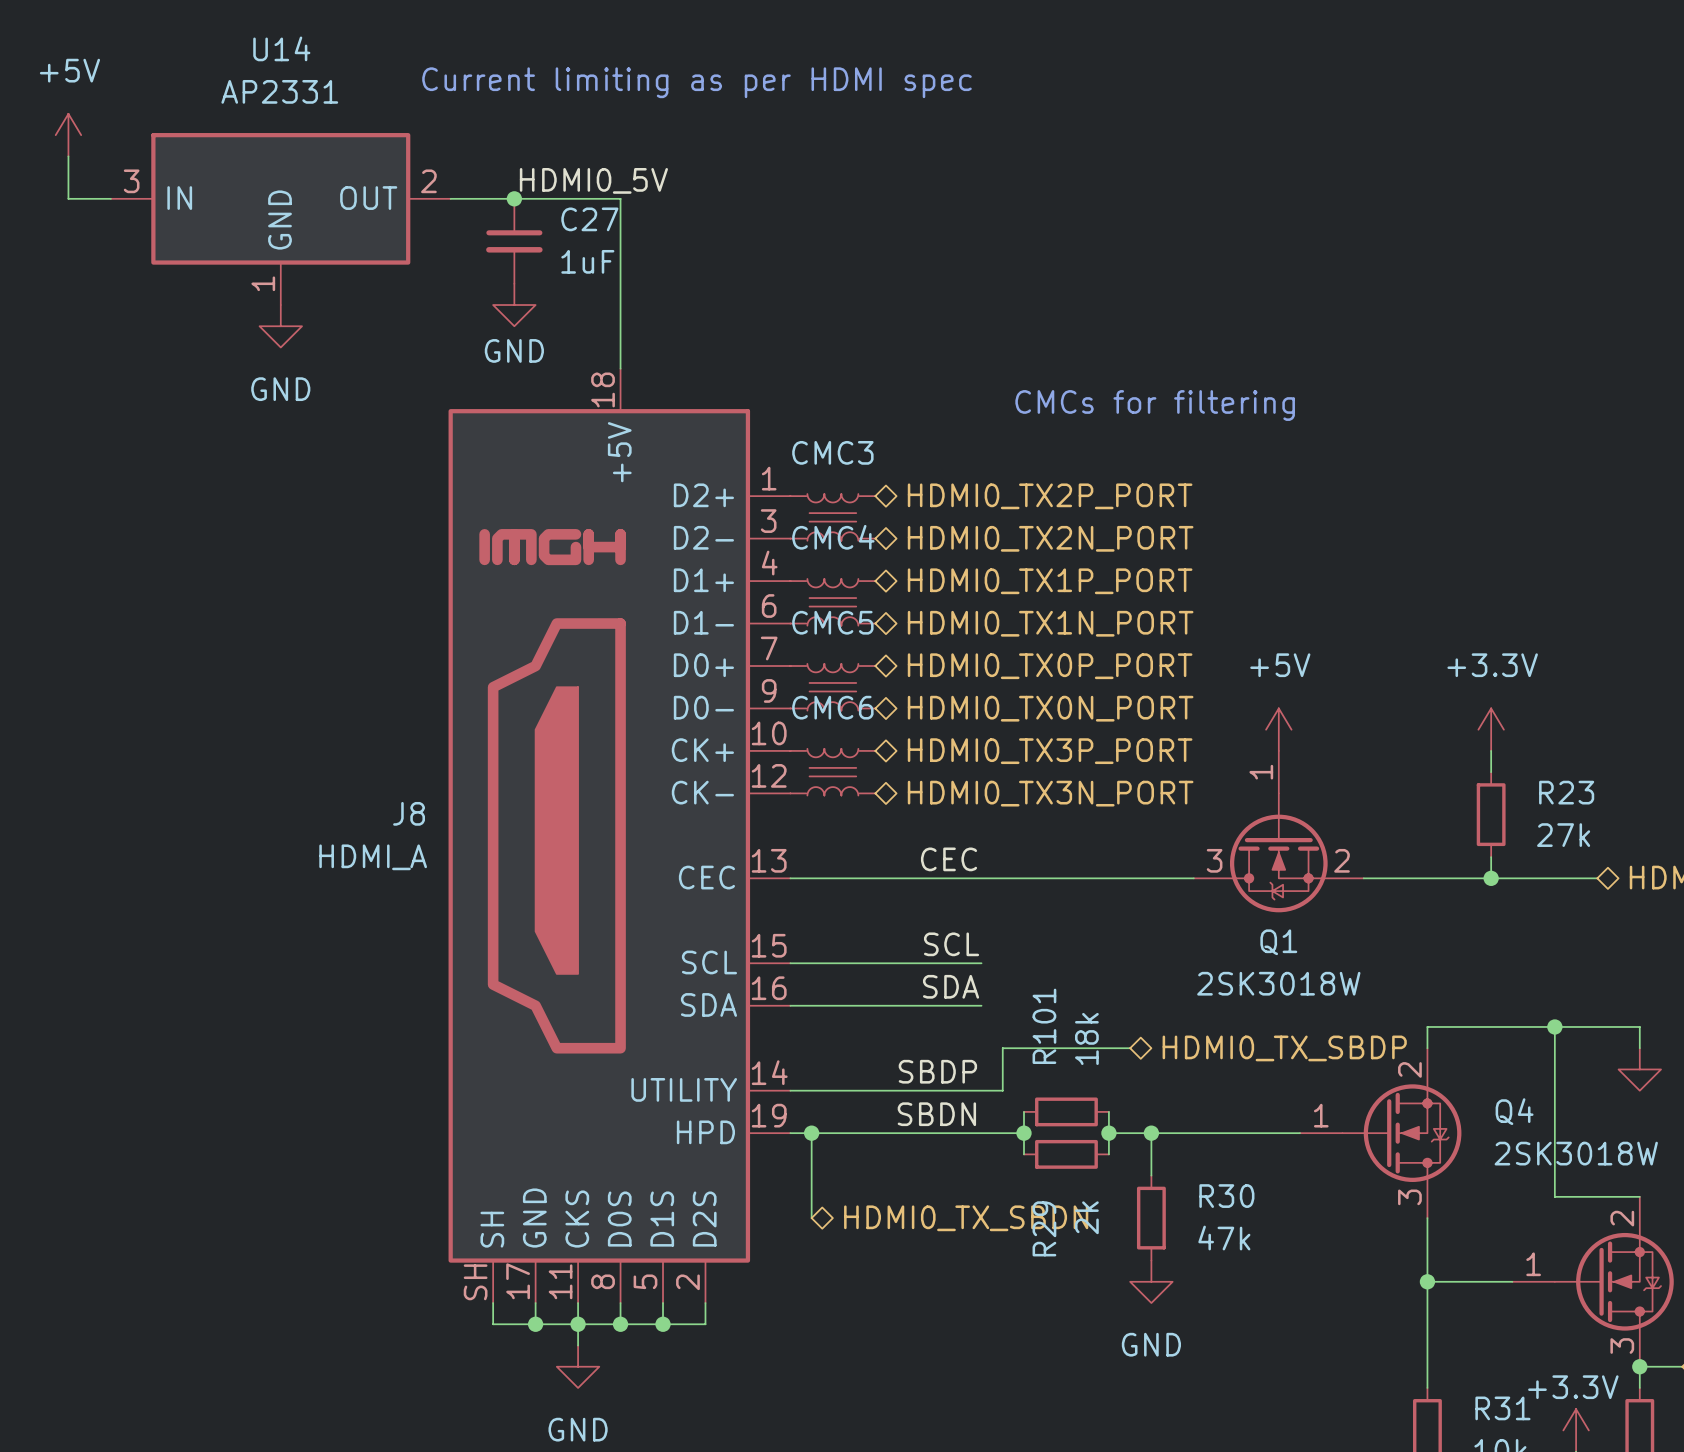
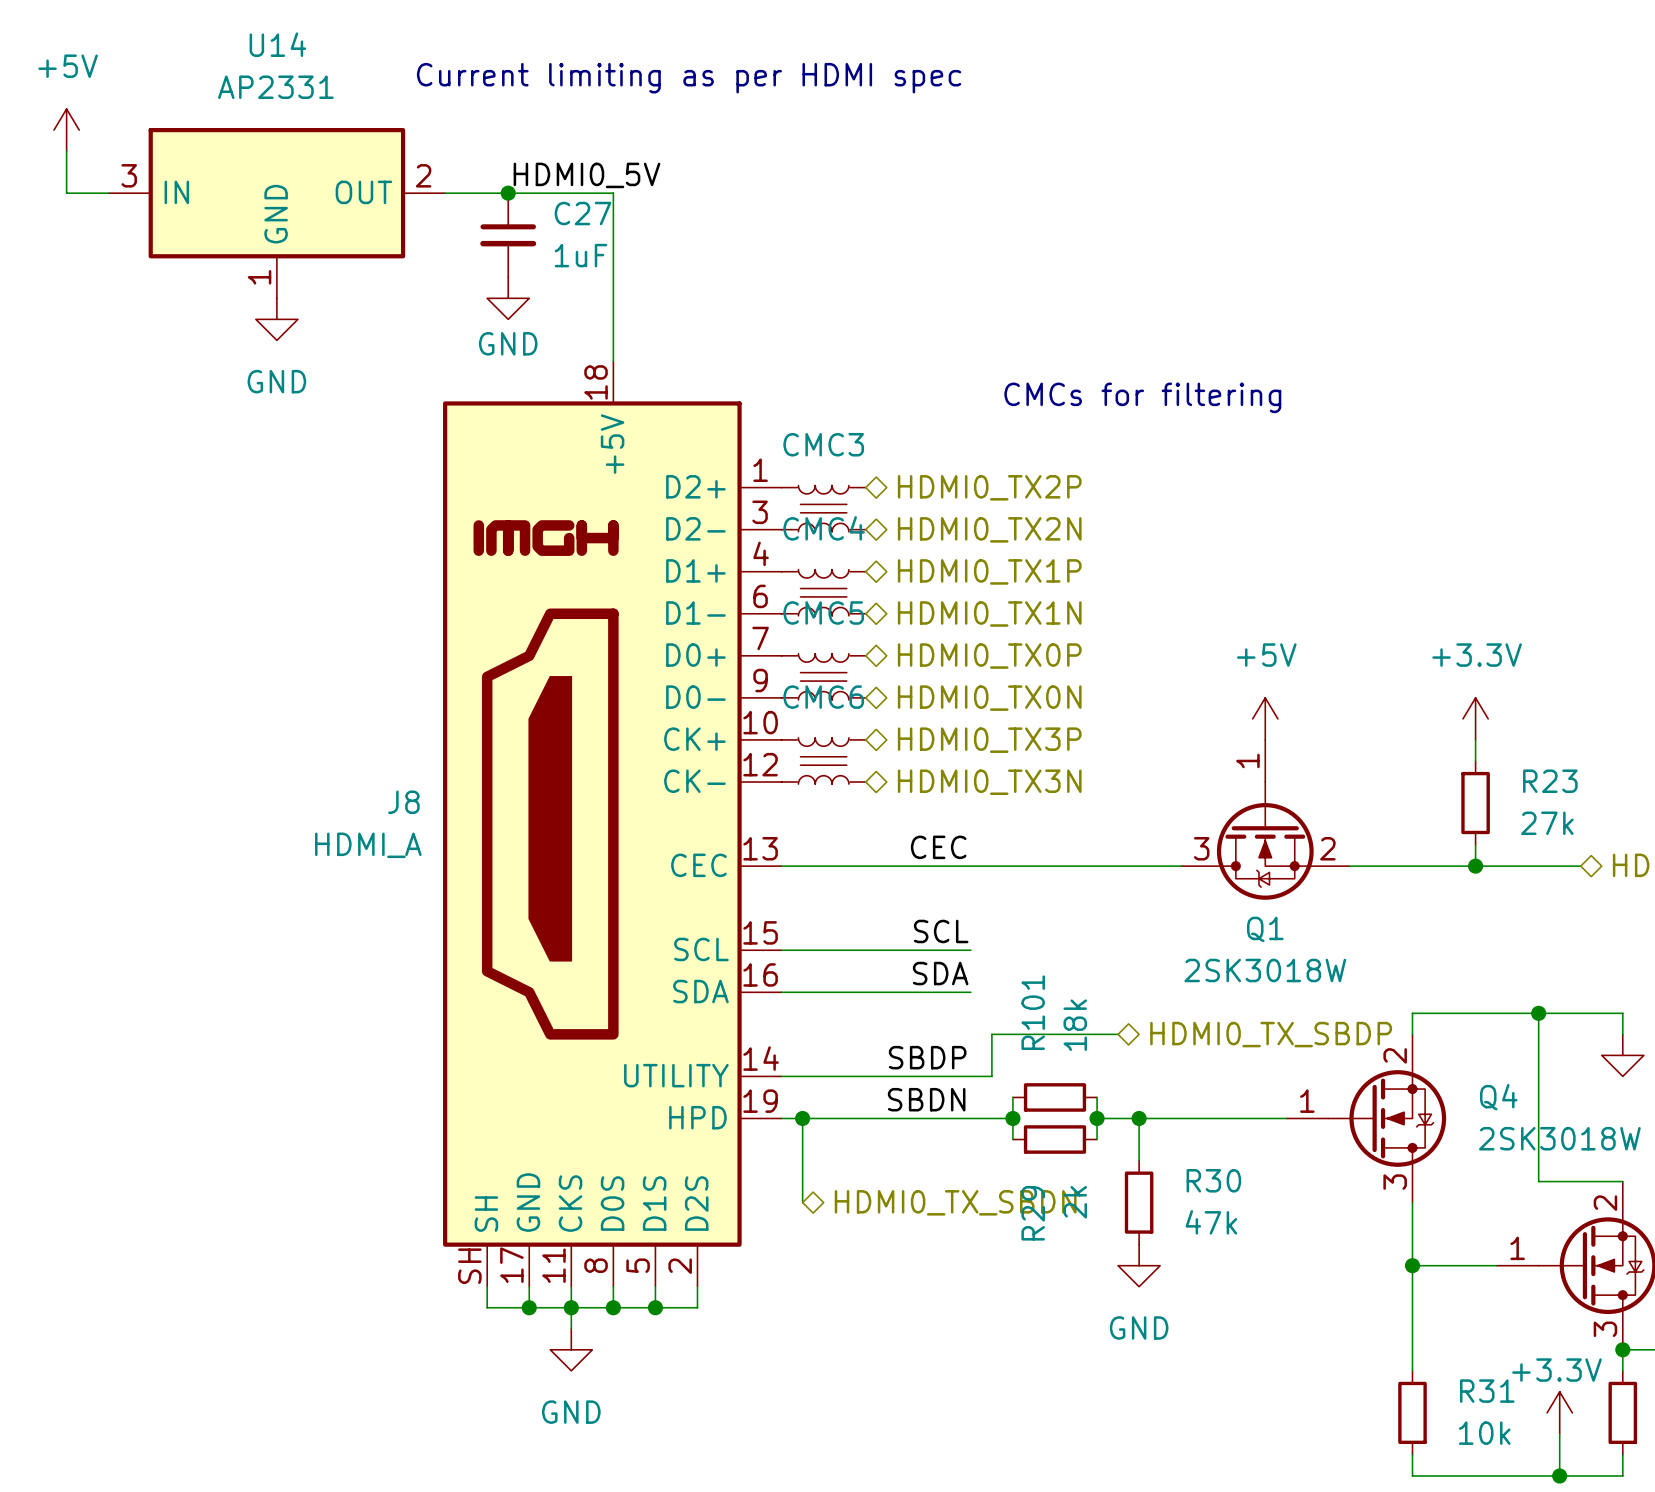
hierarchical label: HDMI0_TX2P_PORT (1050, 496) -> HDMI0_TX2P (989, 487)
hierarchical label: HDMI0_TX2N_PORT (1050, 538) -> HDMI0_TX2N (989, 529)
hierarchical label: HDMI0_TX1P_PORT (1050, 581) -> HDMI0_TX1P (989, 571)
hierarchical label: HDMI0_TX1N_PORT (1050, 623) -> HDMI0_TX1N (989, 613)
hierarchical label: HDMI0_TX0P_PORT (1050, 666) -> HDMI0_TX0P (989, 656)
hierarchical label: HDMI0_TX0N_PORT (1050, 708) -> HDMI0_TX0N (989, 698)
hierarchical label: HDMI0_TX3P_PORT (1050, 751) -> HDMI0_TX3P (989, 740)
hierarchical label: HDMI0_TX3N_PORT (1050, 793) -> HDMI0_TX3N (989, 782)

